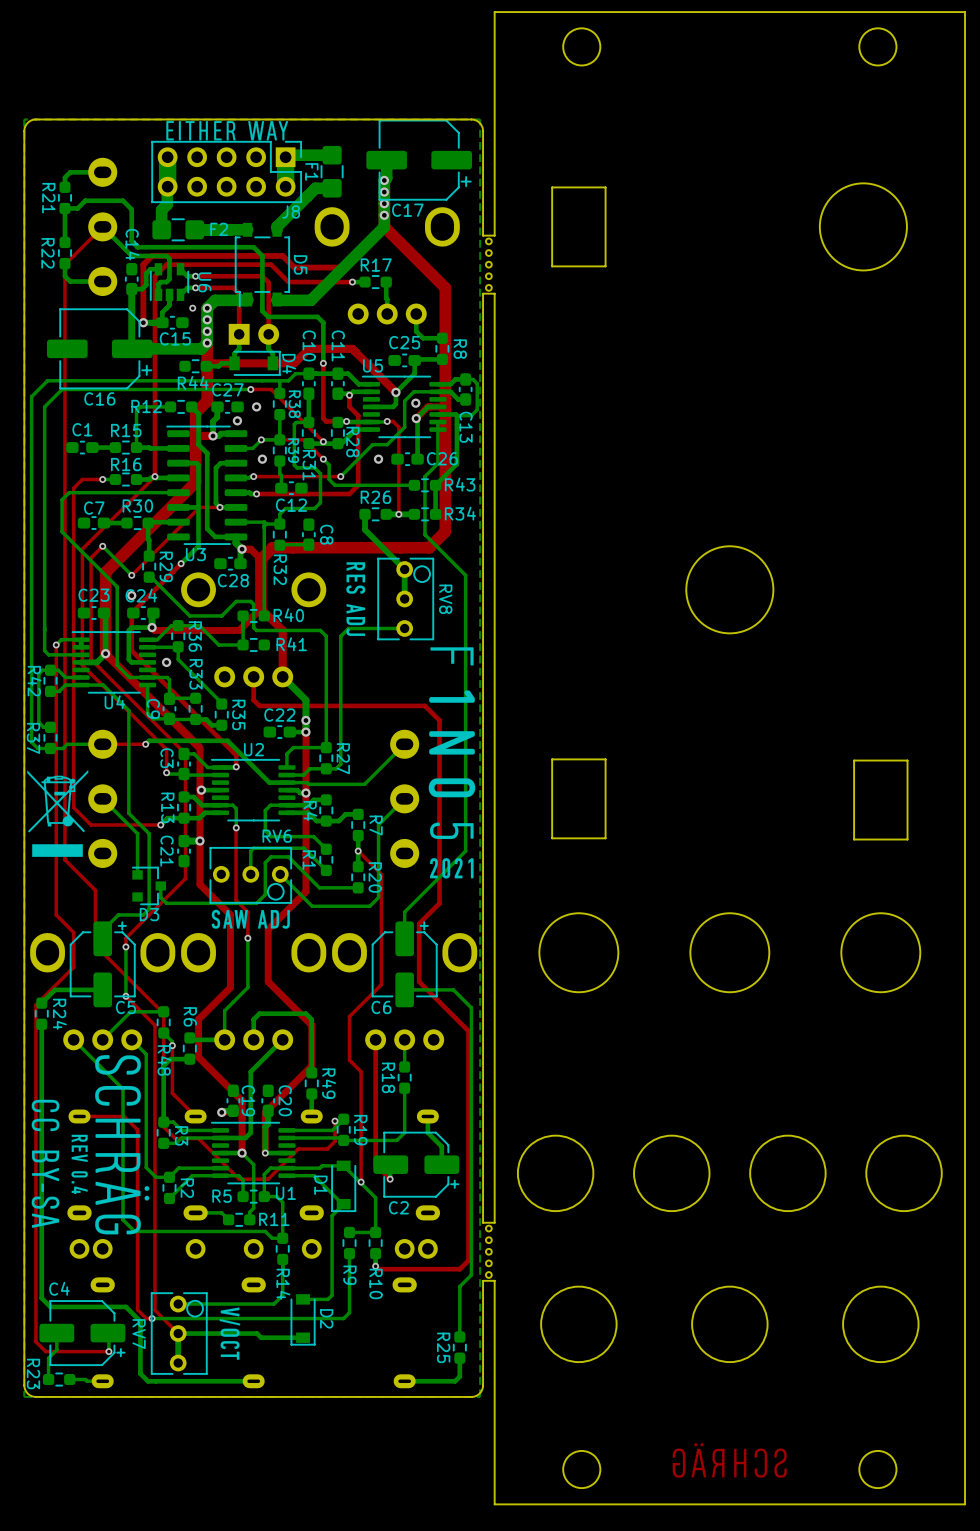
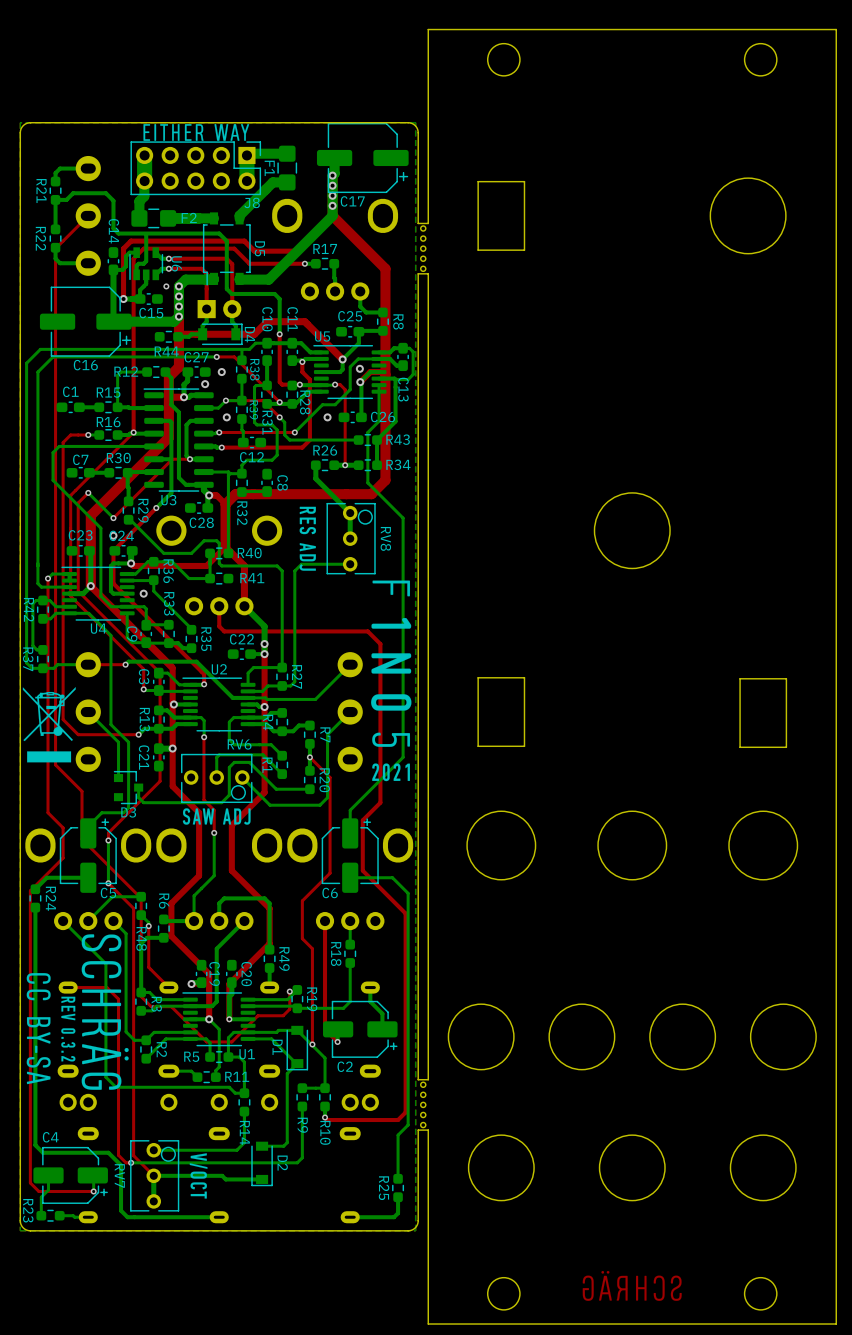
drawing shape: [27, 121, 476, 1360] -> [22, 124, 412, 1199]
bottom track: (102, 226) (131, 255) (166, 255) (169, 258) -> (146, 236) (146, 243)

